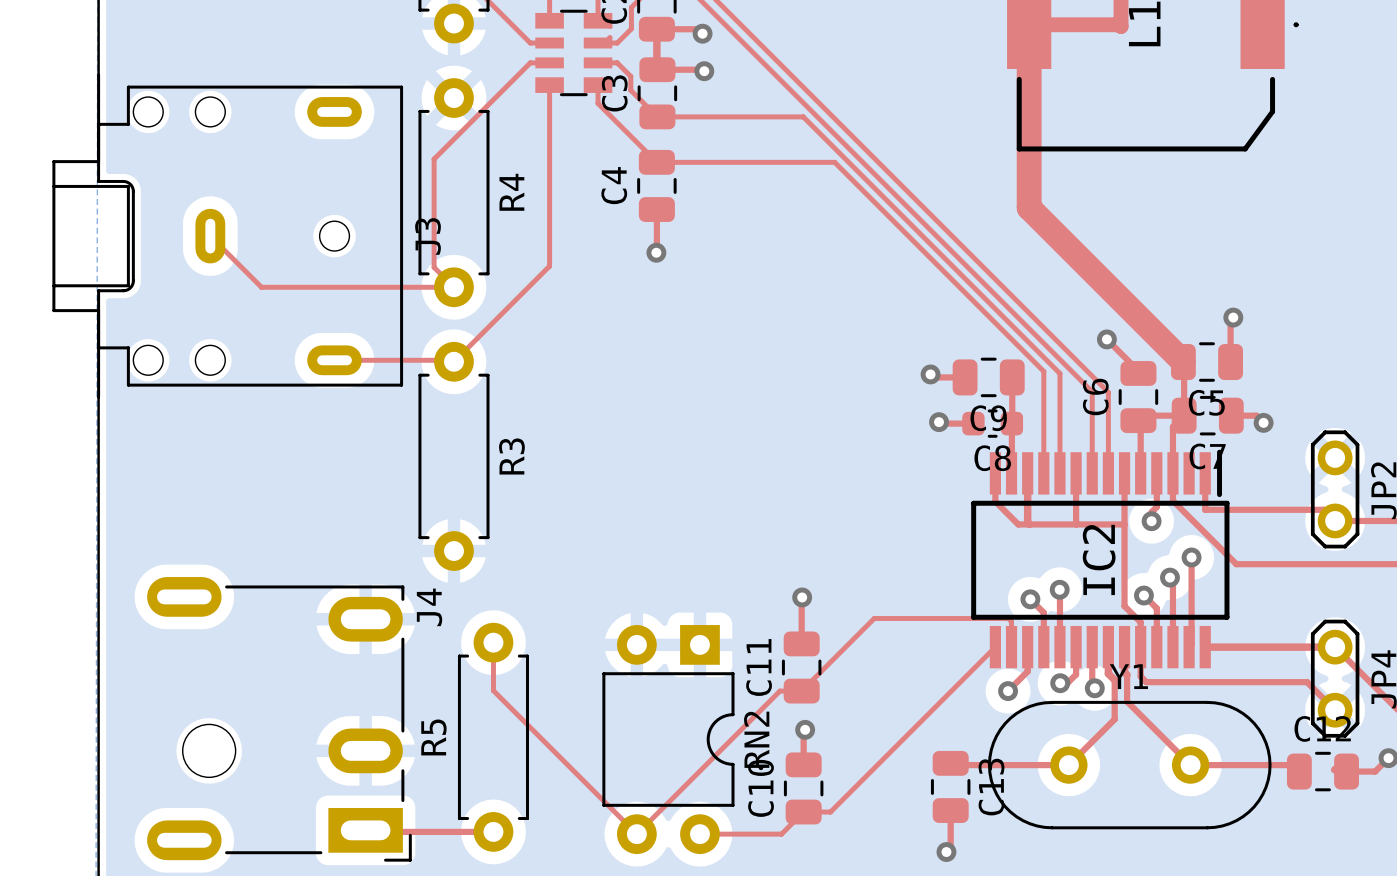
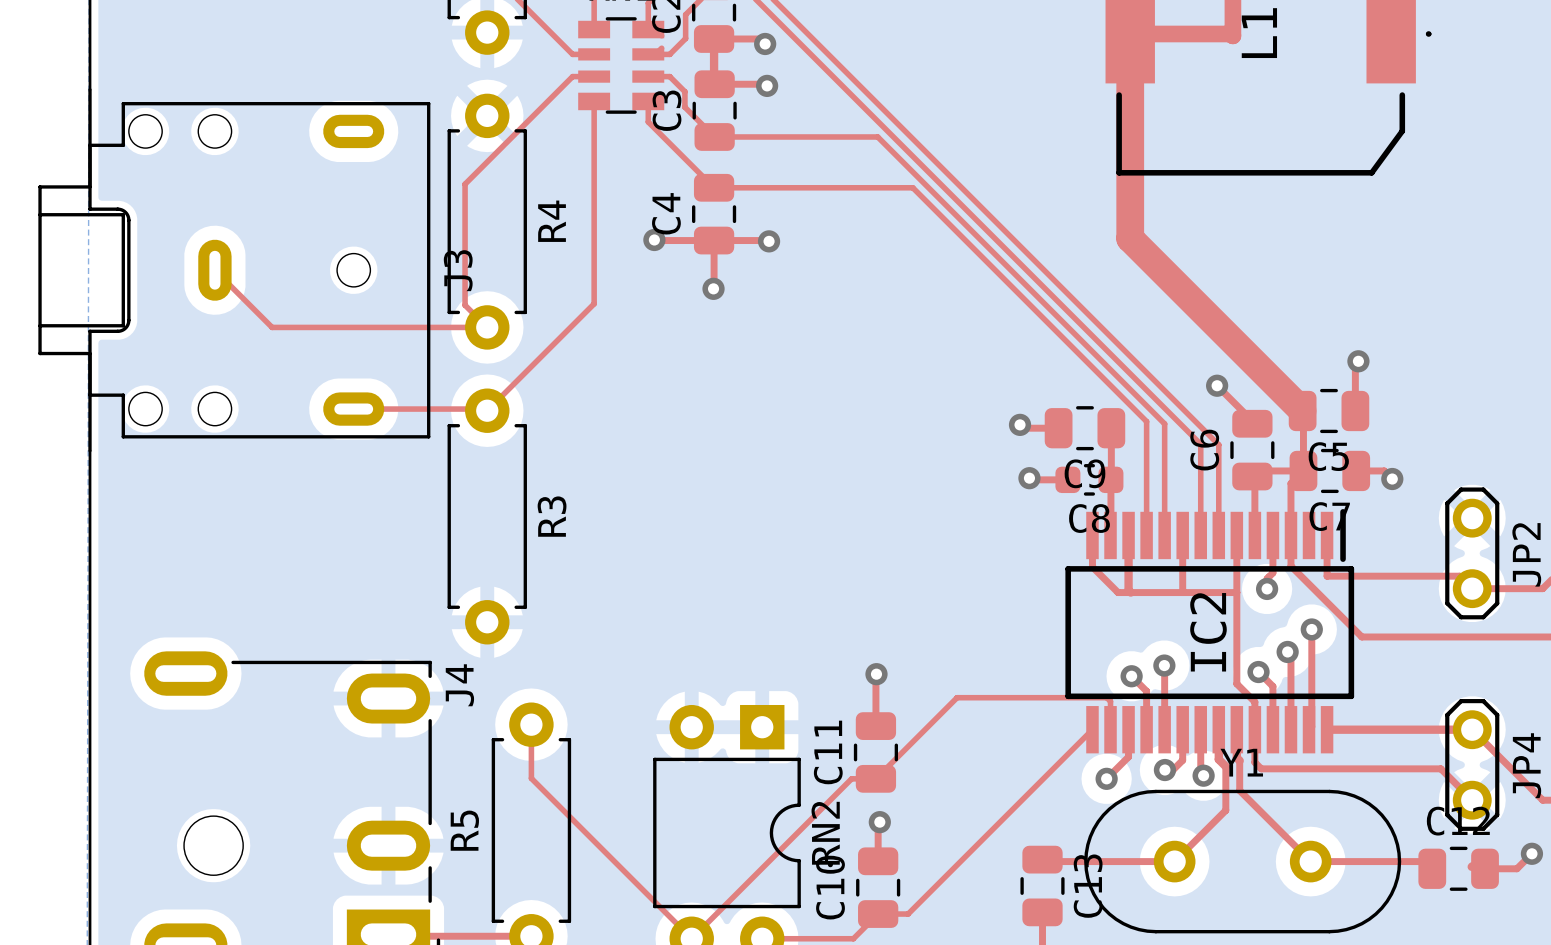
top track: none -> (654, 239) (769, 241)
via: none -> (654, 239)
via: none -> (769, 241)

